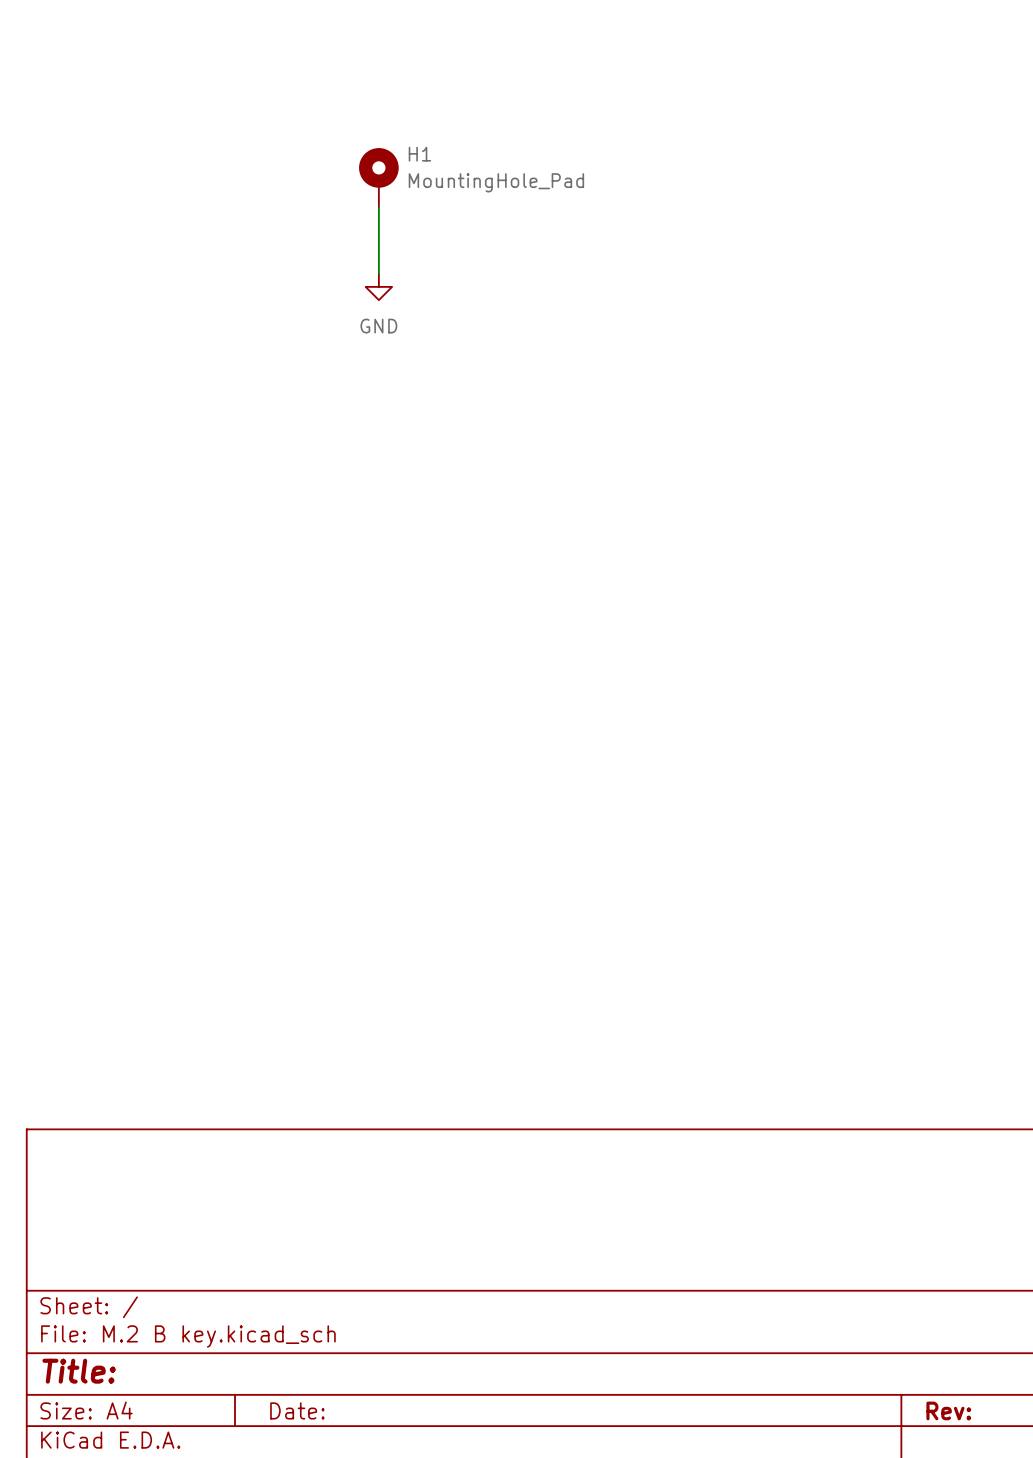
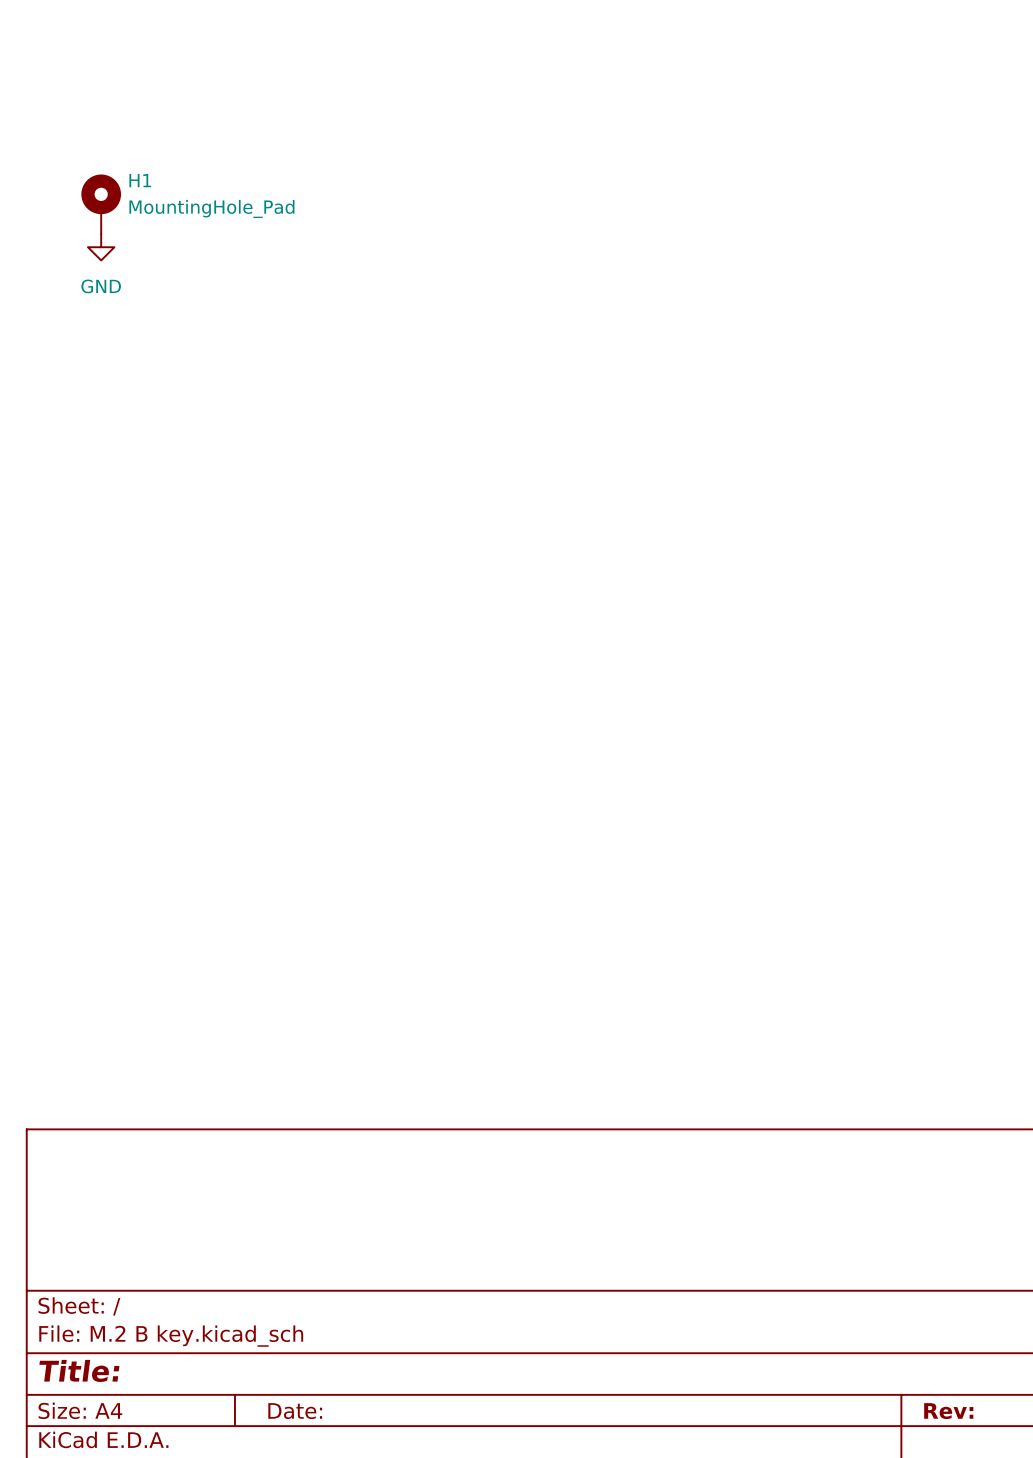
H1 position: (378, 177) -> (101, 204)
wire: (378, 207) (378, 273) -> none
power symbol: none -> GND (101, 247)
power symbol: GND (378, 286) -> none

